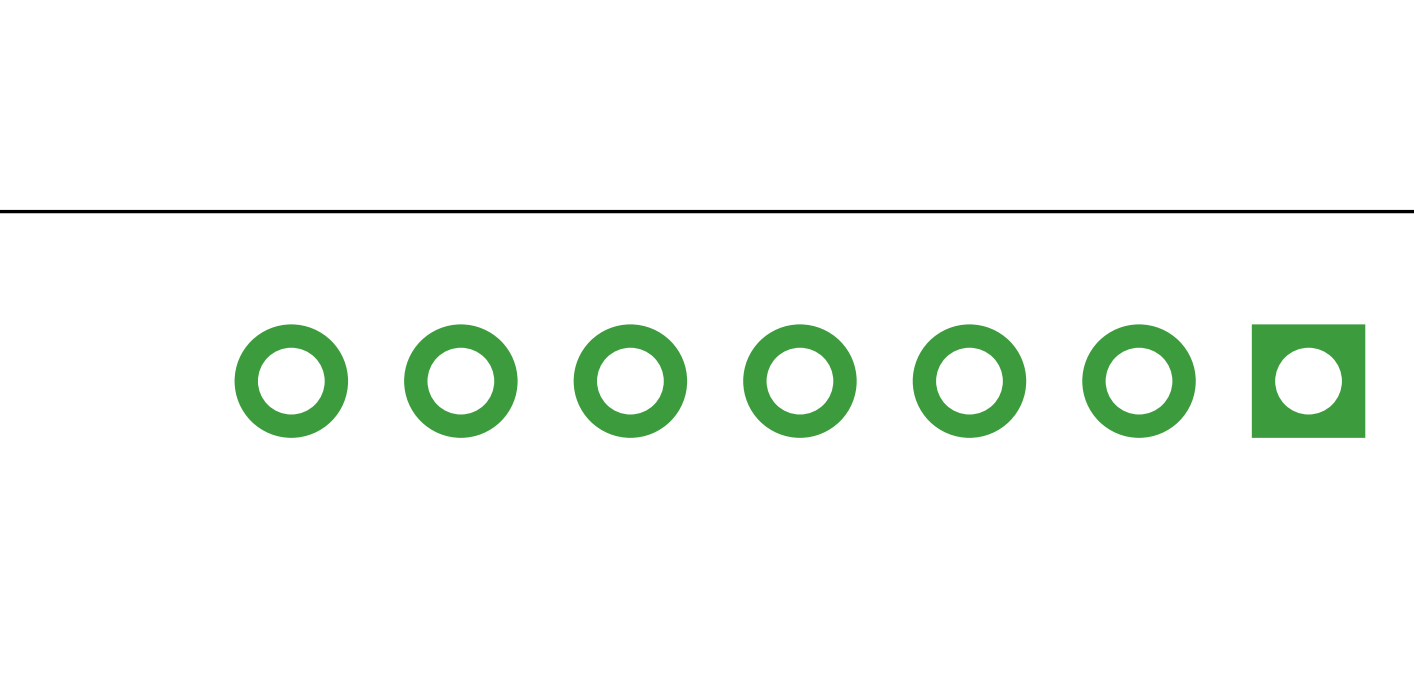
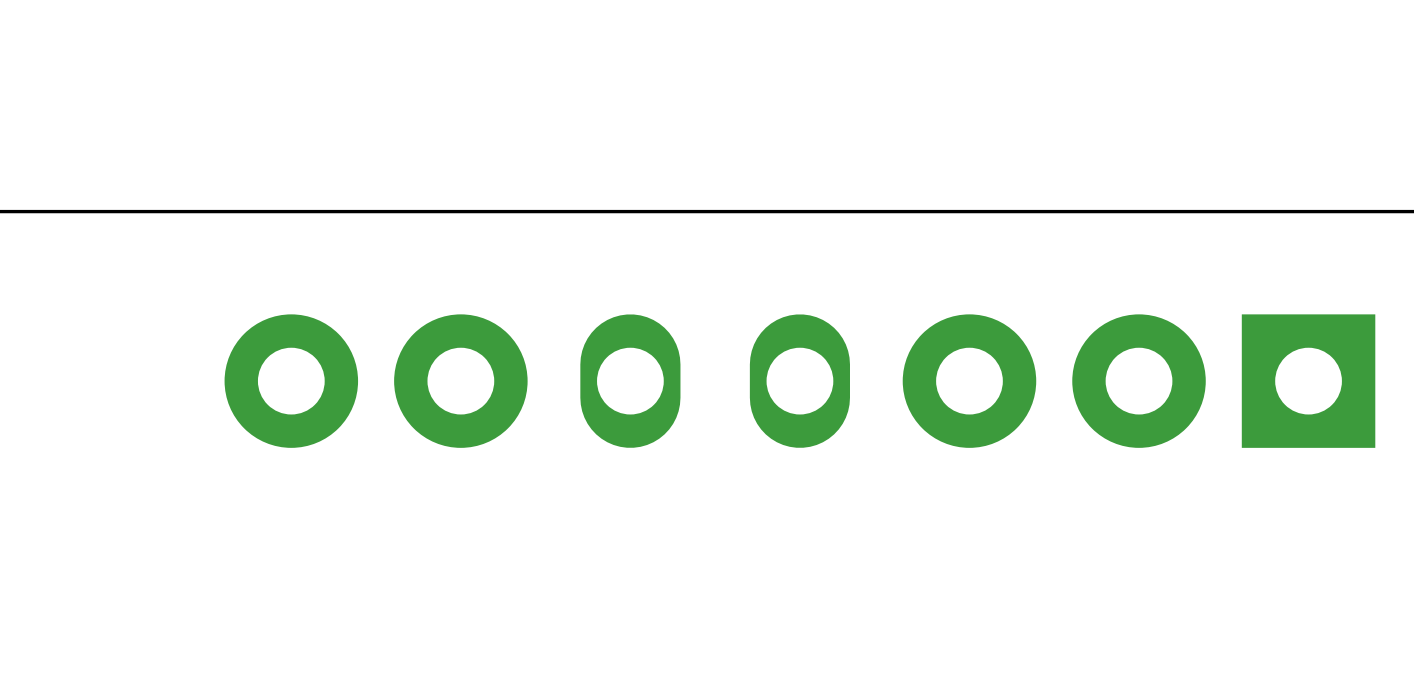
part footprint: [234, 324, 1366, 438] -> [224, 314, 1376, 448]

